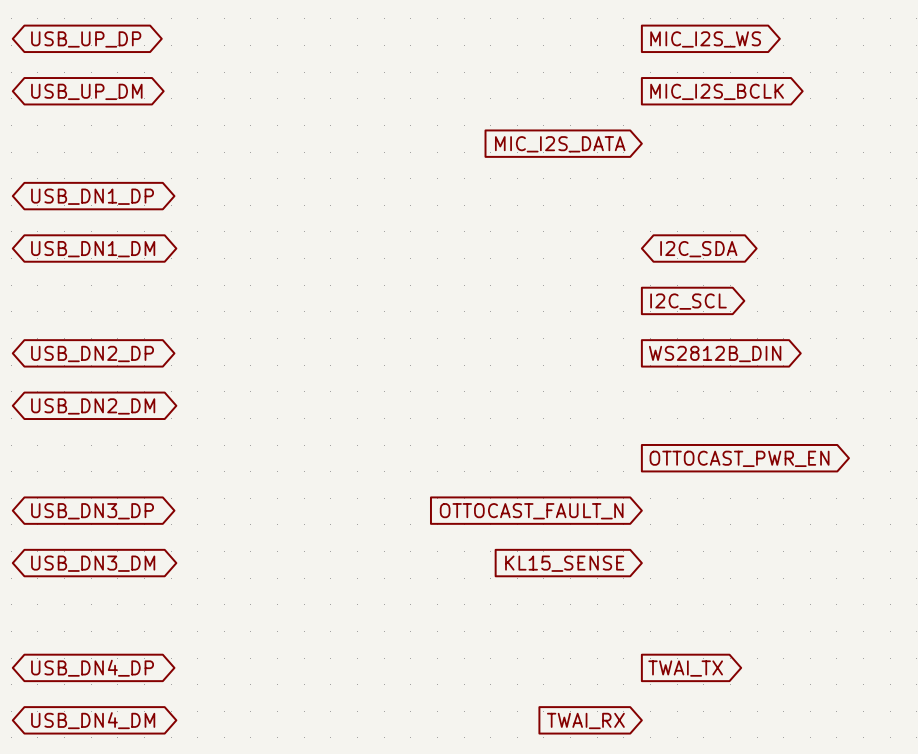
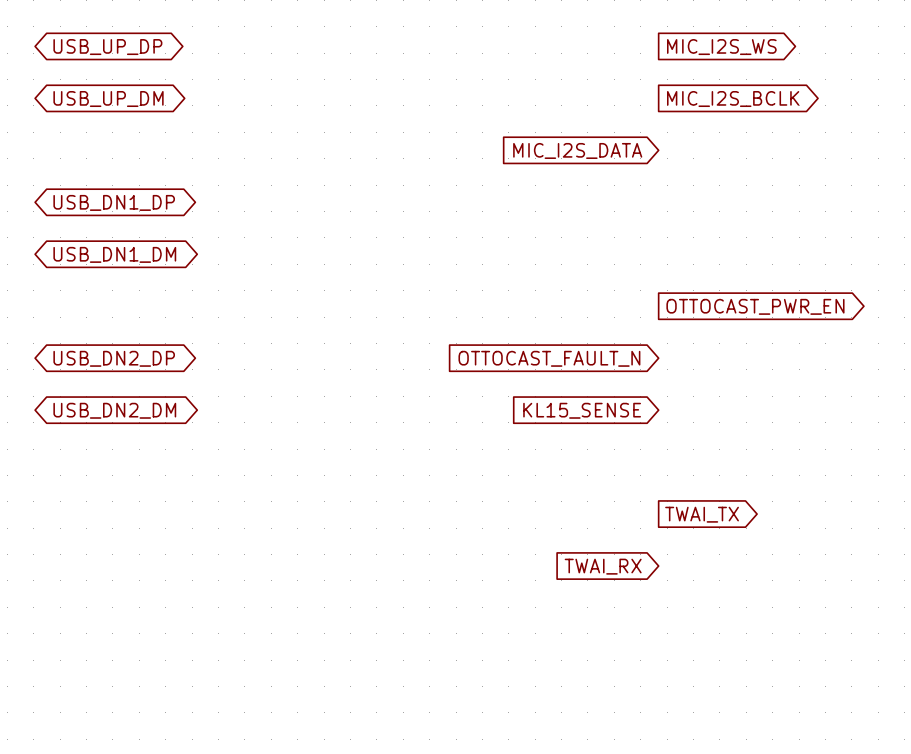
global label: I2C_SDA (698, 249) -> none
global label: I2C_SCL (688, 301) -> OTTOCAST_PWR_EN (755, 306)
global label shape: output (715, 354) -> input (549, 358)
global label: WS2812B_DIN (715, 354) -> OTTOCAST_FAULT_N (549, 358)
global label: none -> KL15_SENSE (582, 410)
global label: OTTOCAST_PWR_EN (739, 458) -> none
global label: USB_DN3_DP (92, 511) -> none
global label shape: input (531, 511) -> output (702, 514)
global label: OTTOCAST_FAULT_N (531, 511) -> TWAI_TX (702, 514)
global label: USB_DN3_DM (93, 563) -> none
global label: KL15_SENSE (564, 563) -> TWAI_RX (603, 566)
global label: USB_DN4_DP (92, 668) -> none
global label: TWAI_TX (685, 668) -> none
global label: USB_DN4_DM (93, 720) -> none
global label: TWAI_RX (585, 720) -> none

